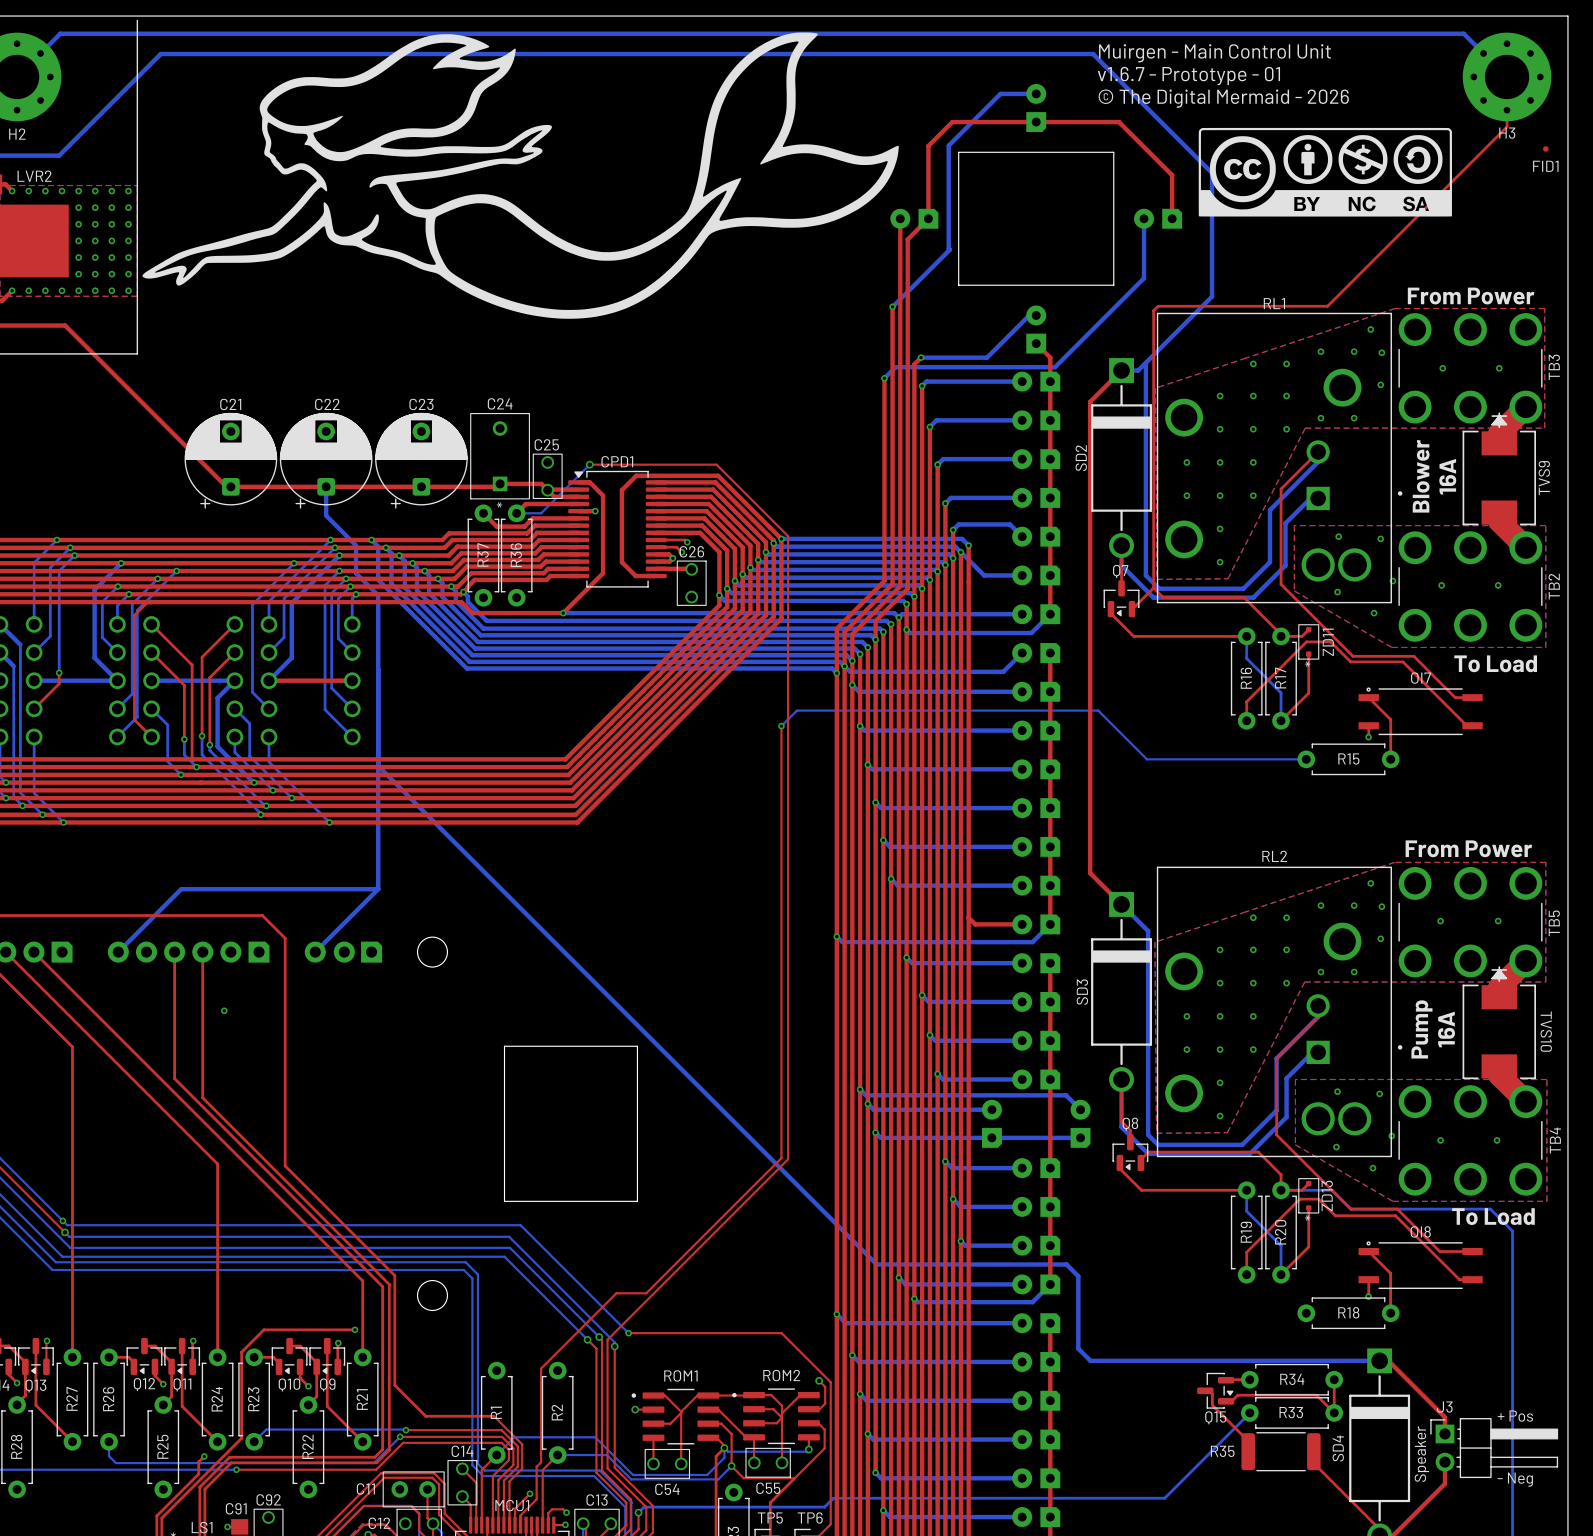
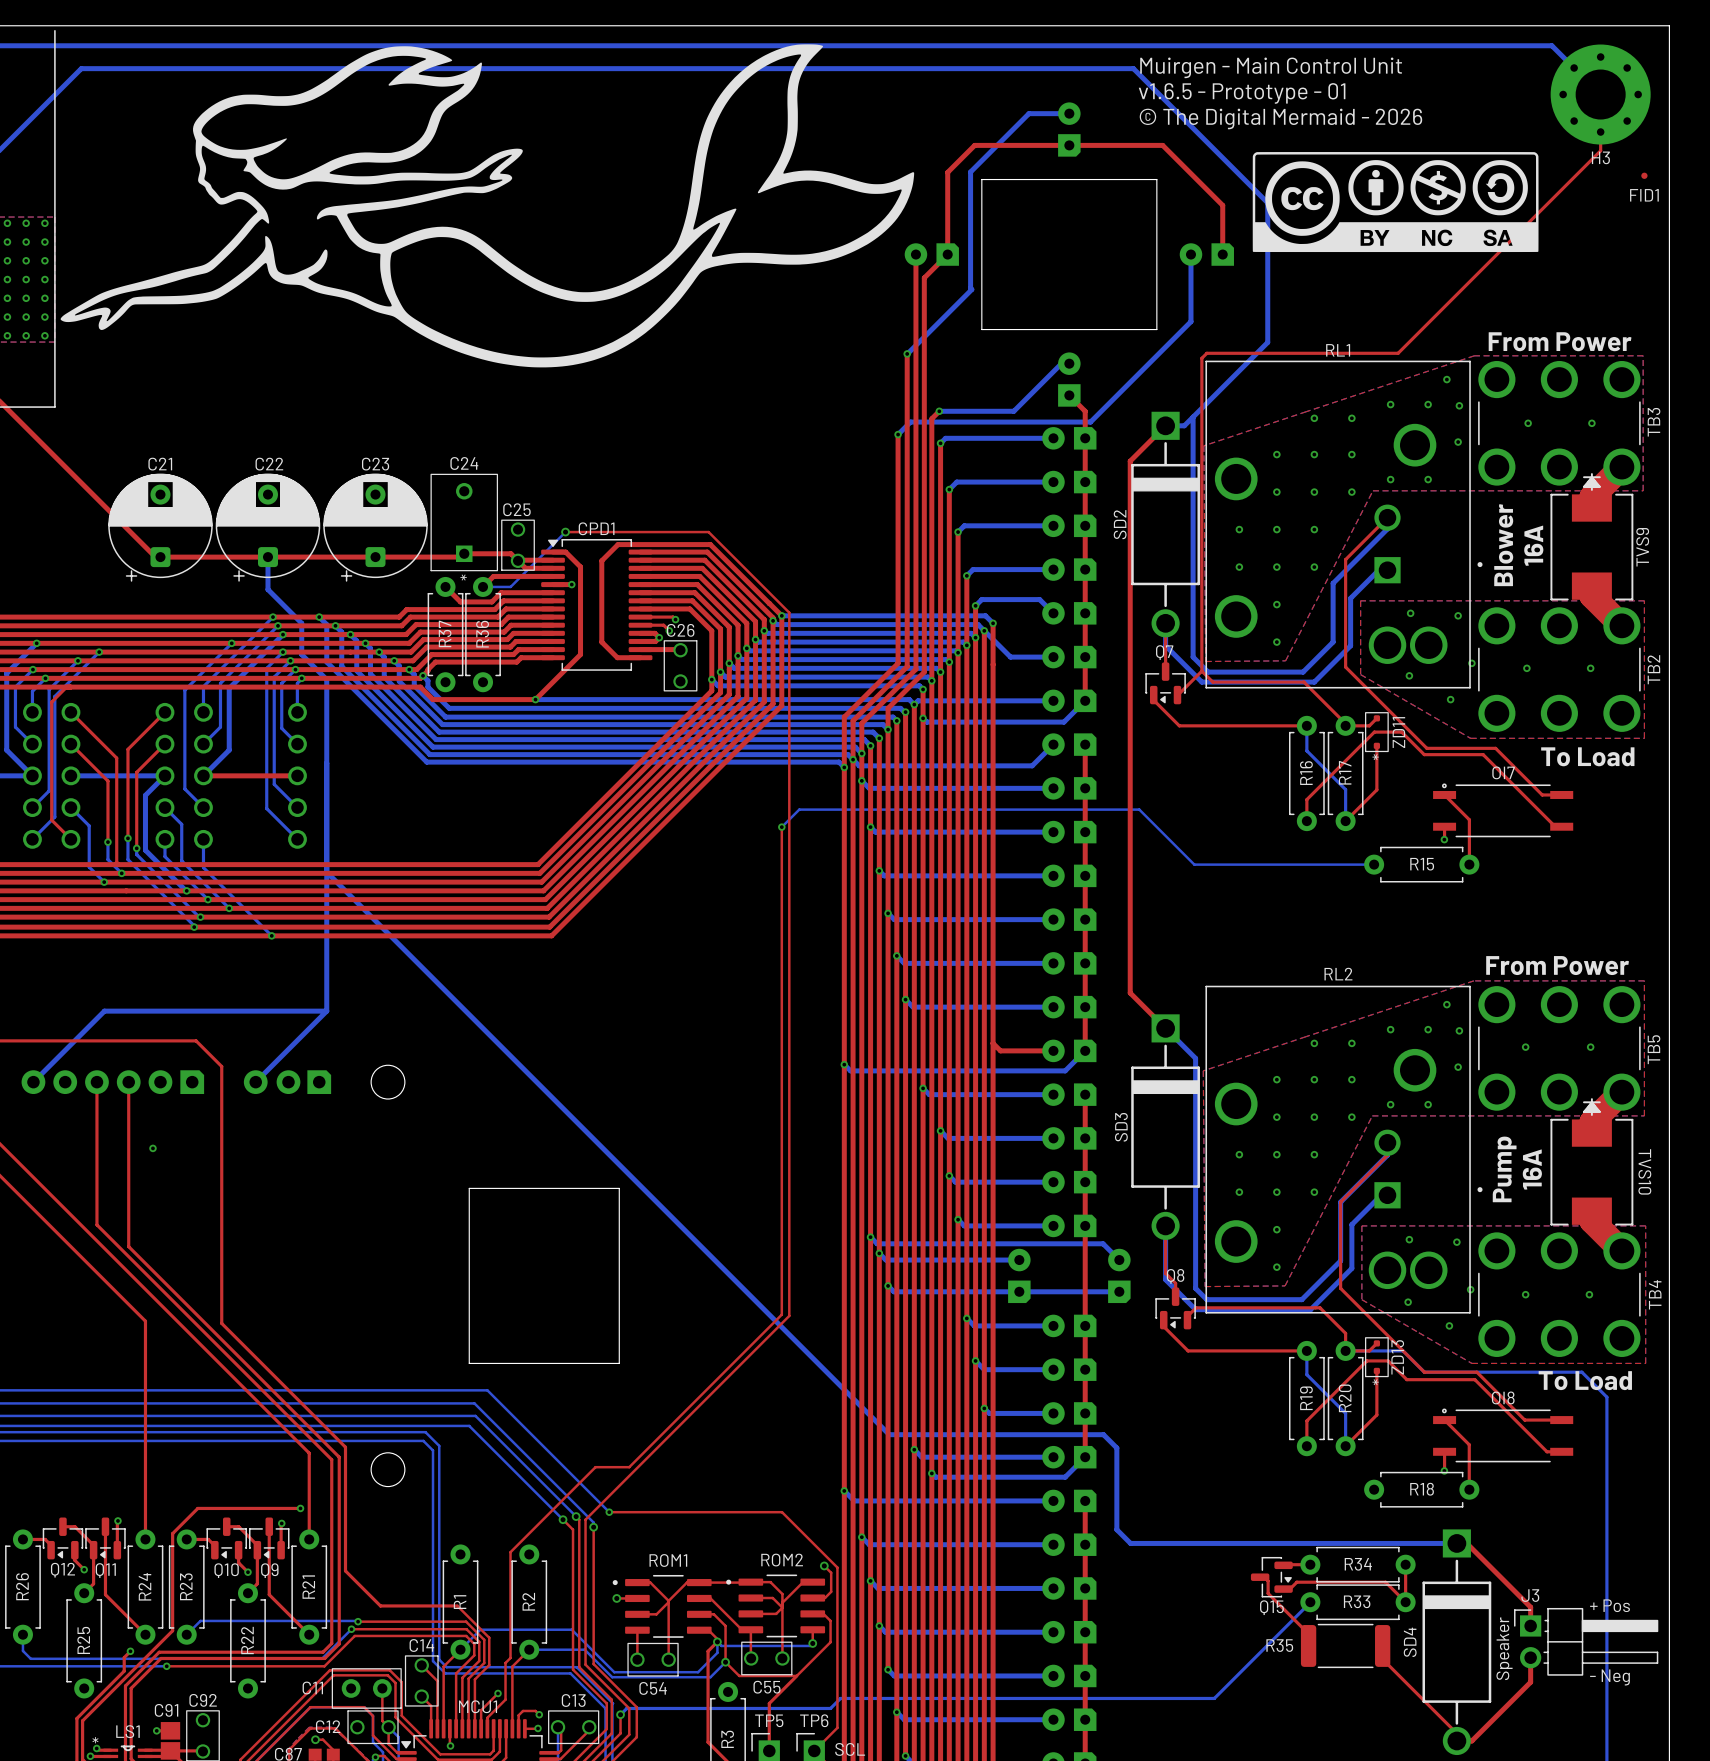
text: v1.6.7 - Prototype - 01 (1188, 76) -> v1.6.5 - Prototype - 01 (1242, 93)

